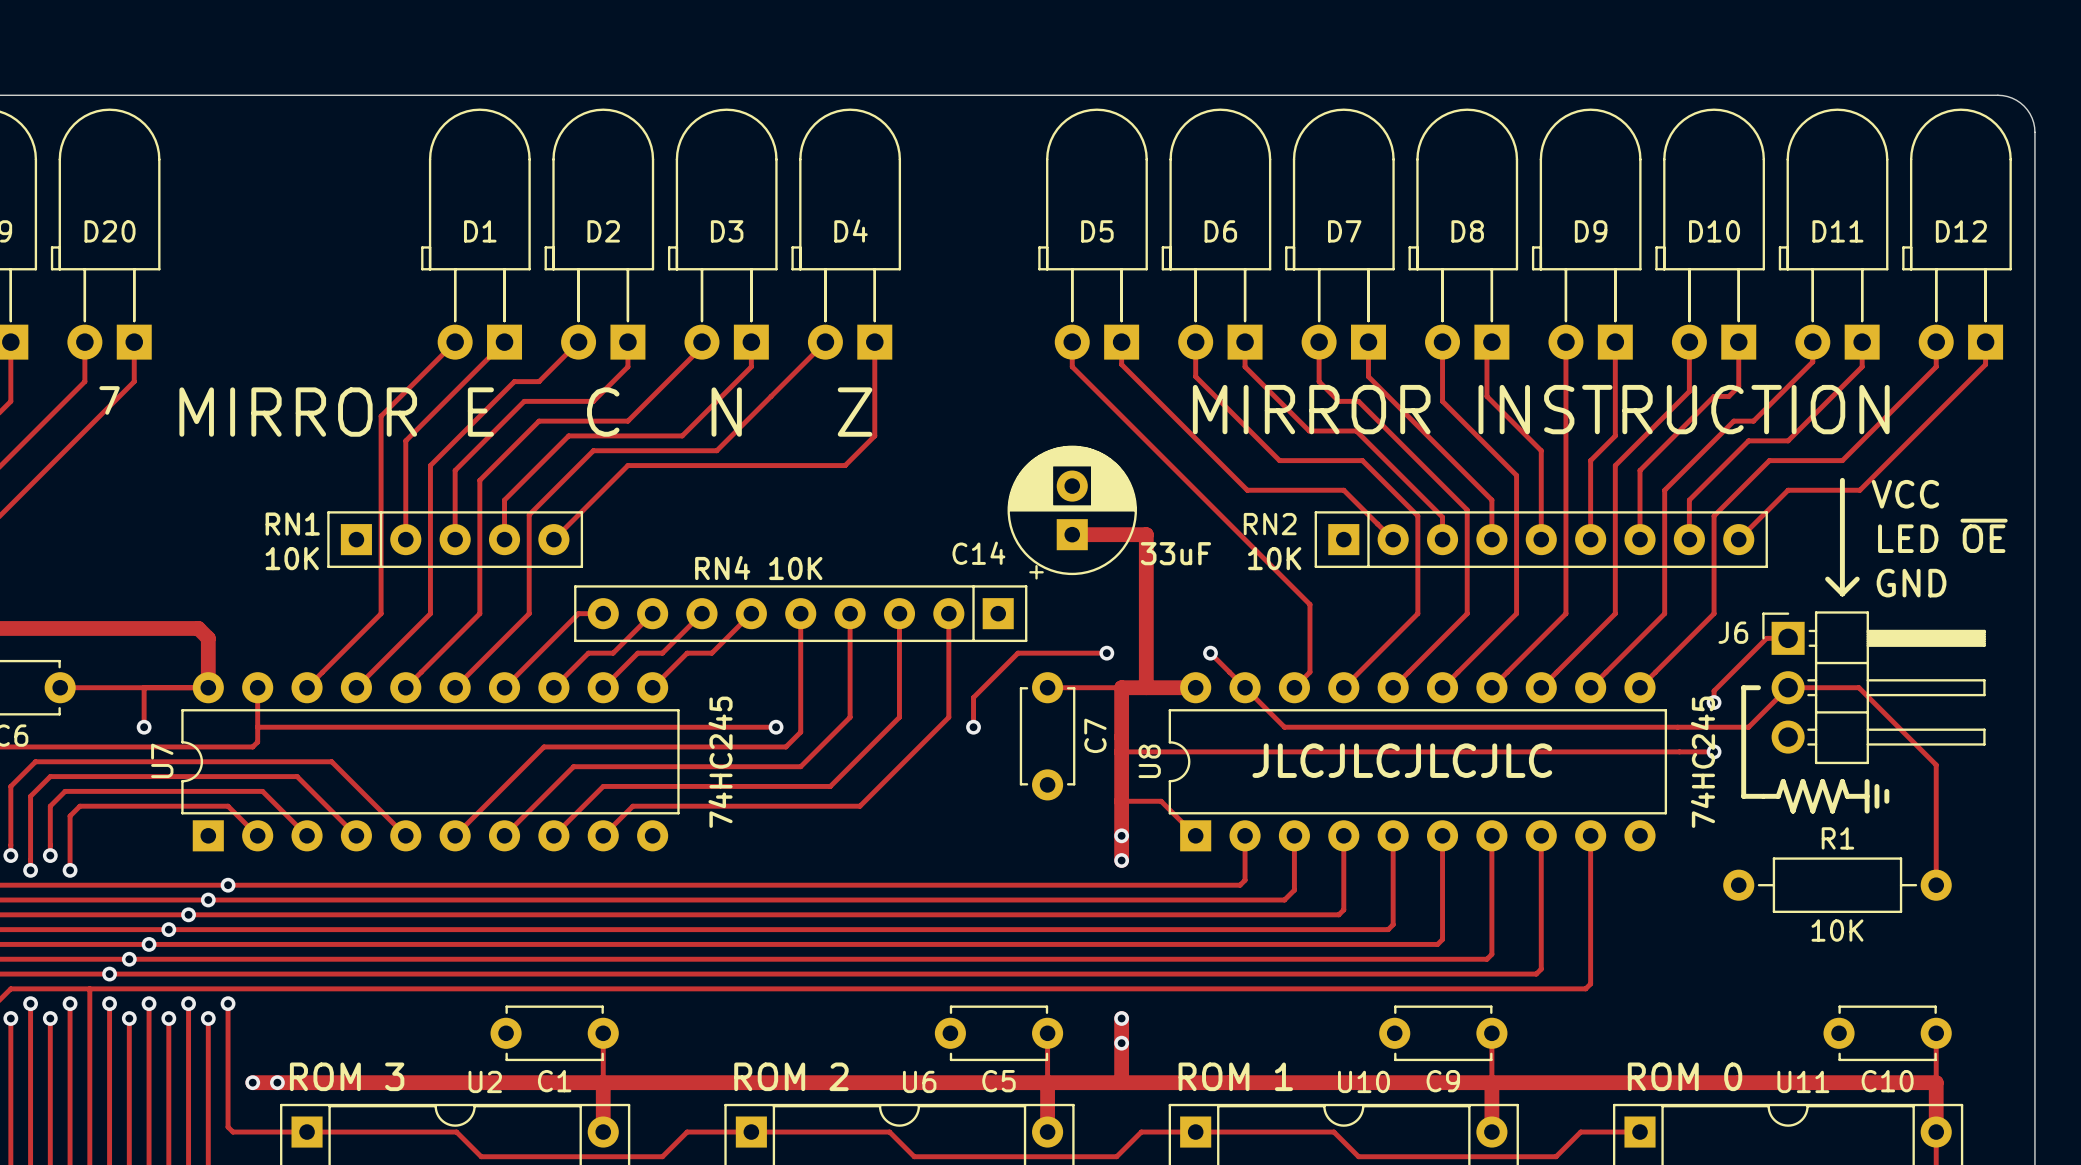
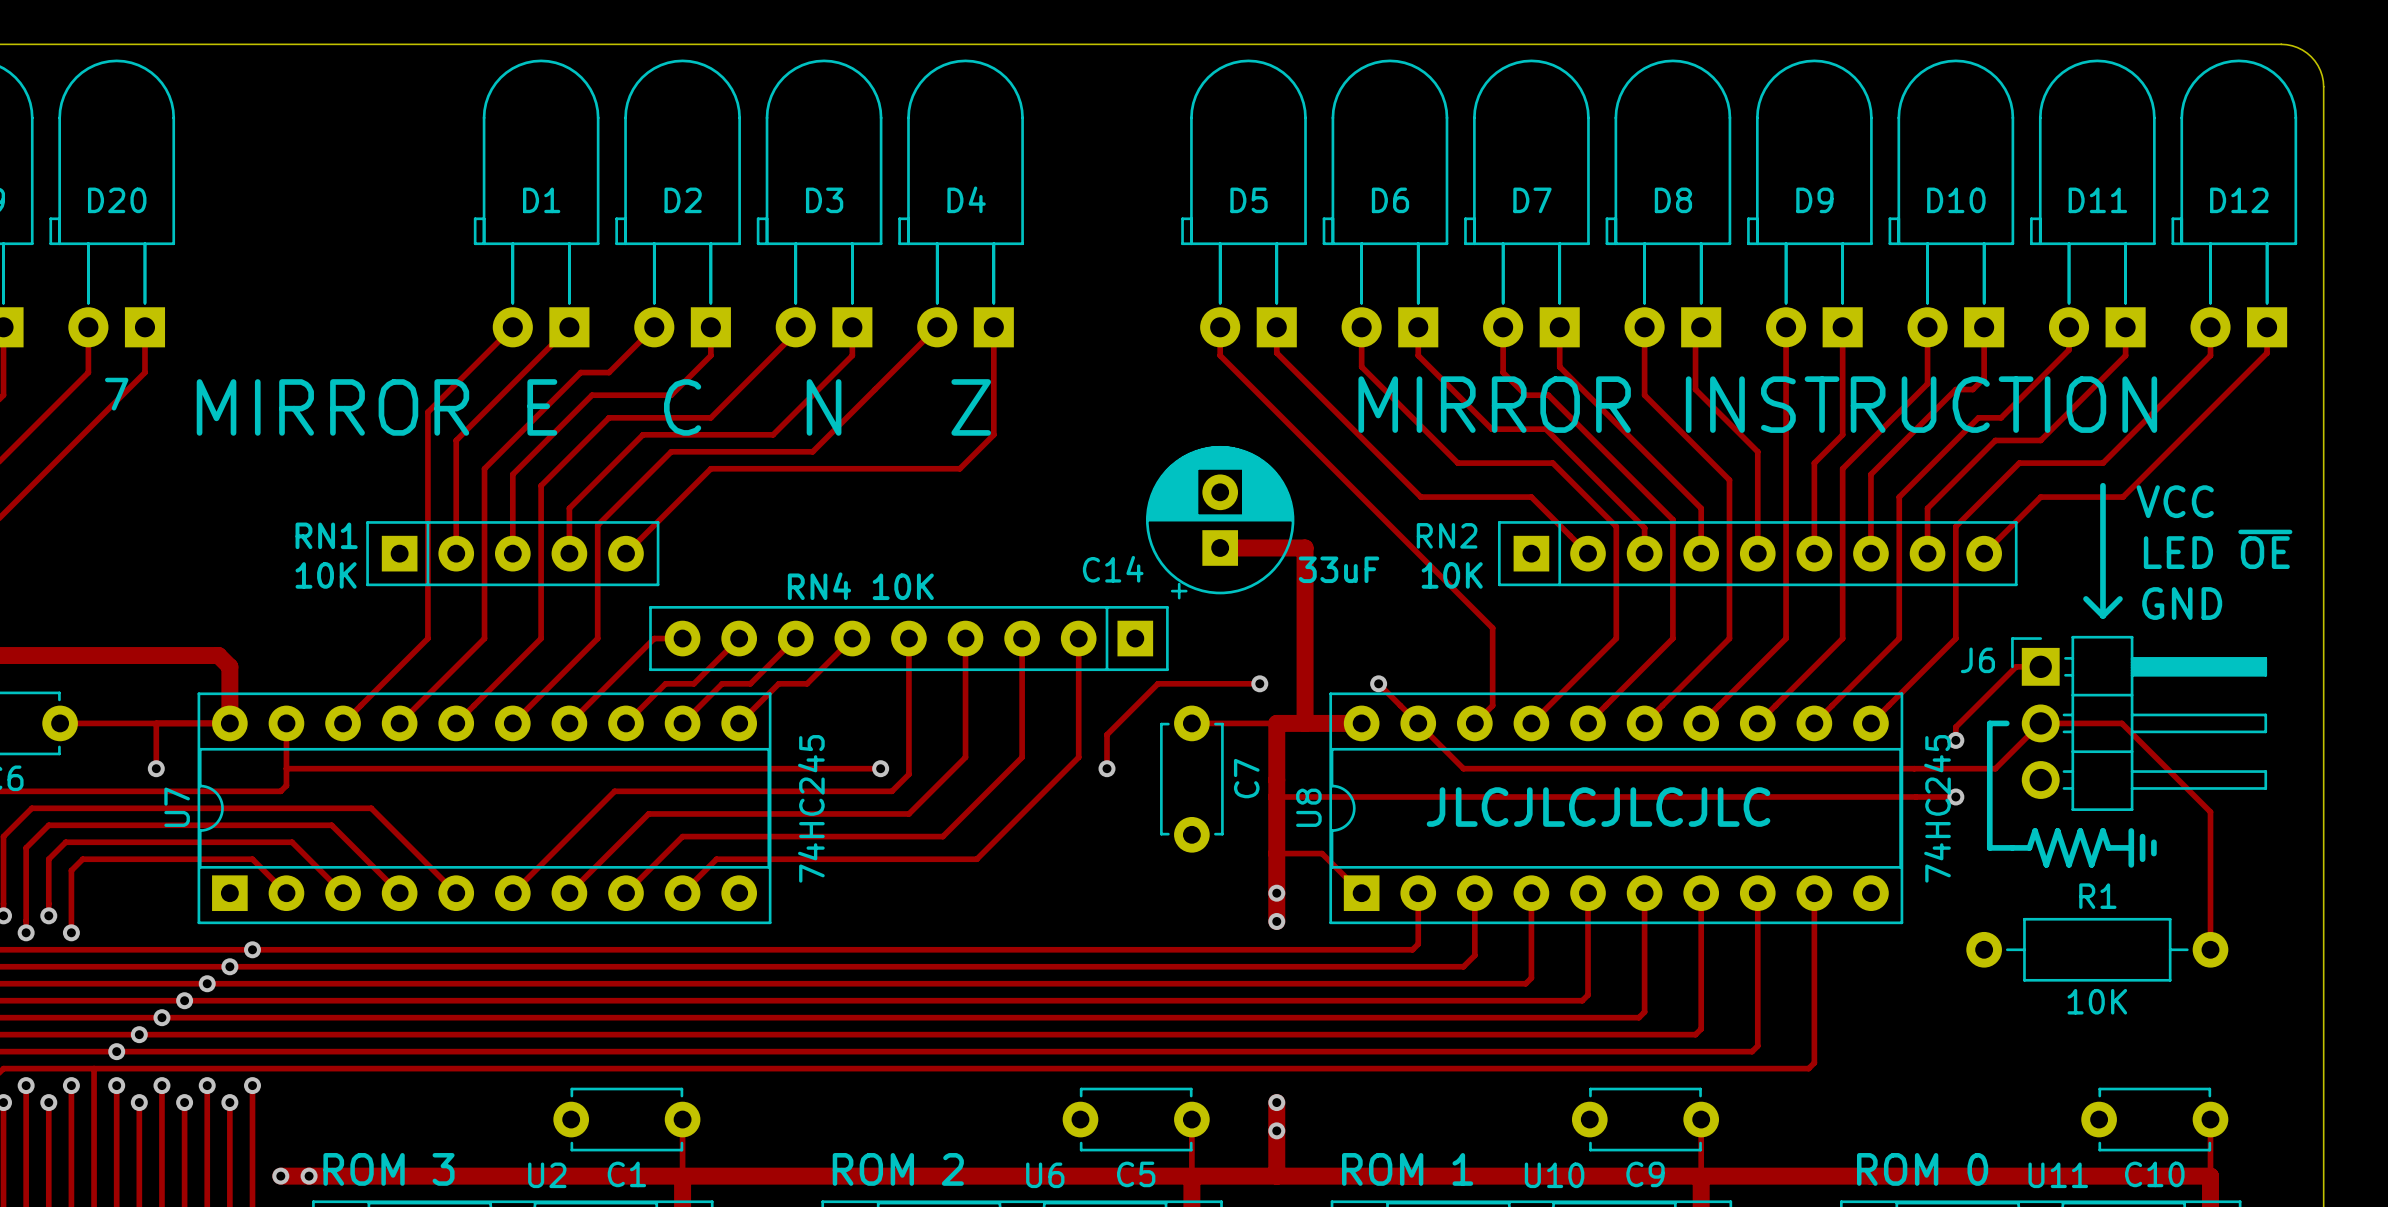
U7 footprint: [181, 672, 680, 852] -> [197, 692, 772, 925]
U8 footprint: [1168, 672, 1668, 852] -> [1329, 692, 1904, 925]

